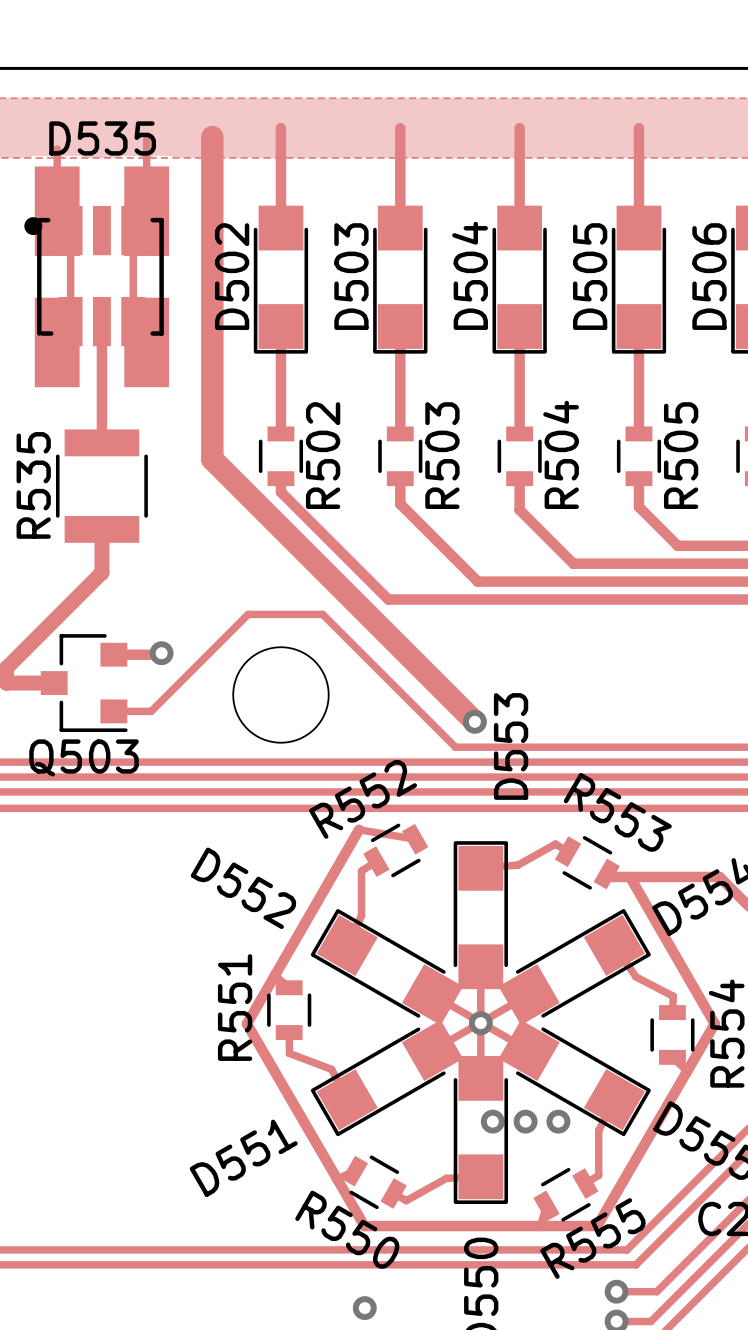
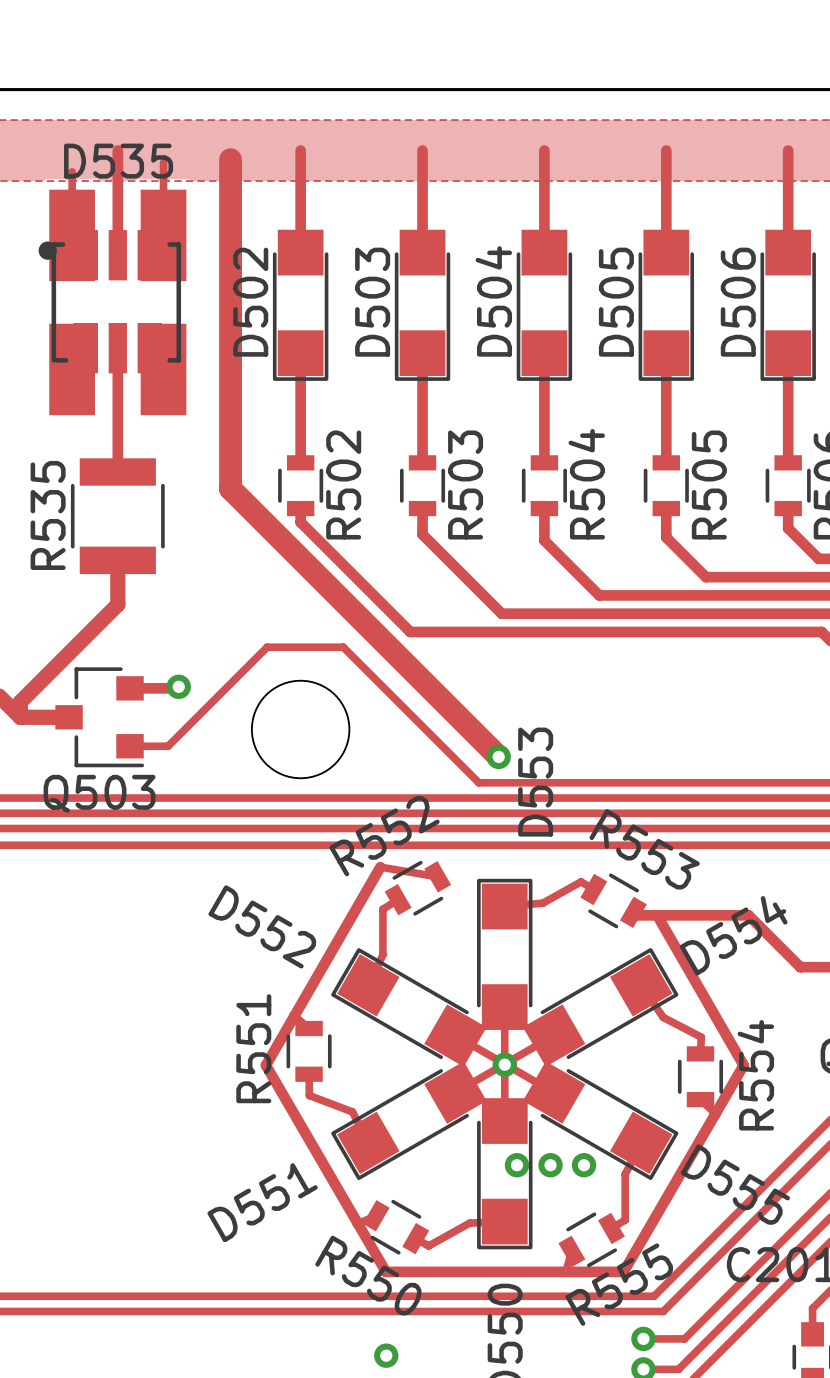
track: none -> (117, 150) (117, 255)
track: (131, 229) (133, 321) -> none
track: (70, 230) (72, 322) -> none

